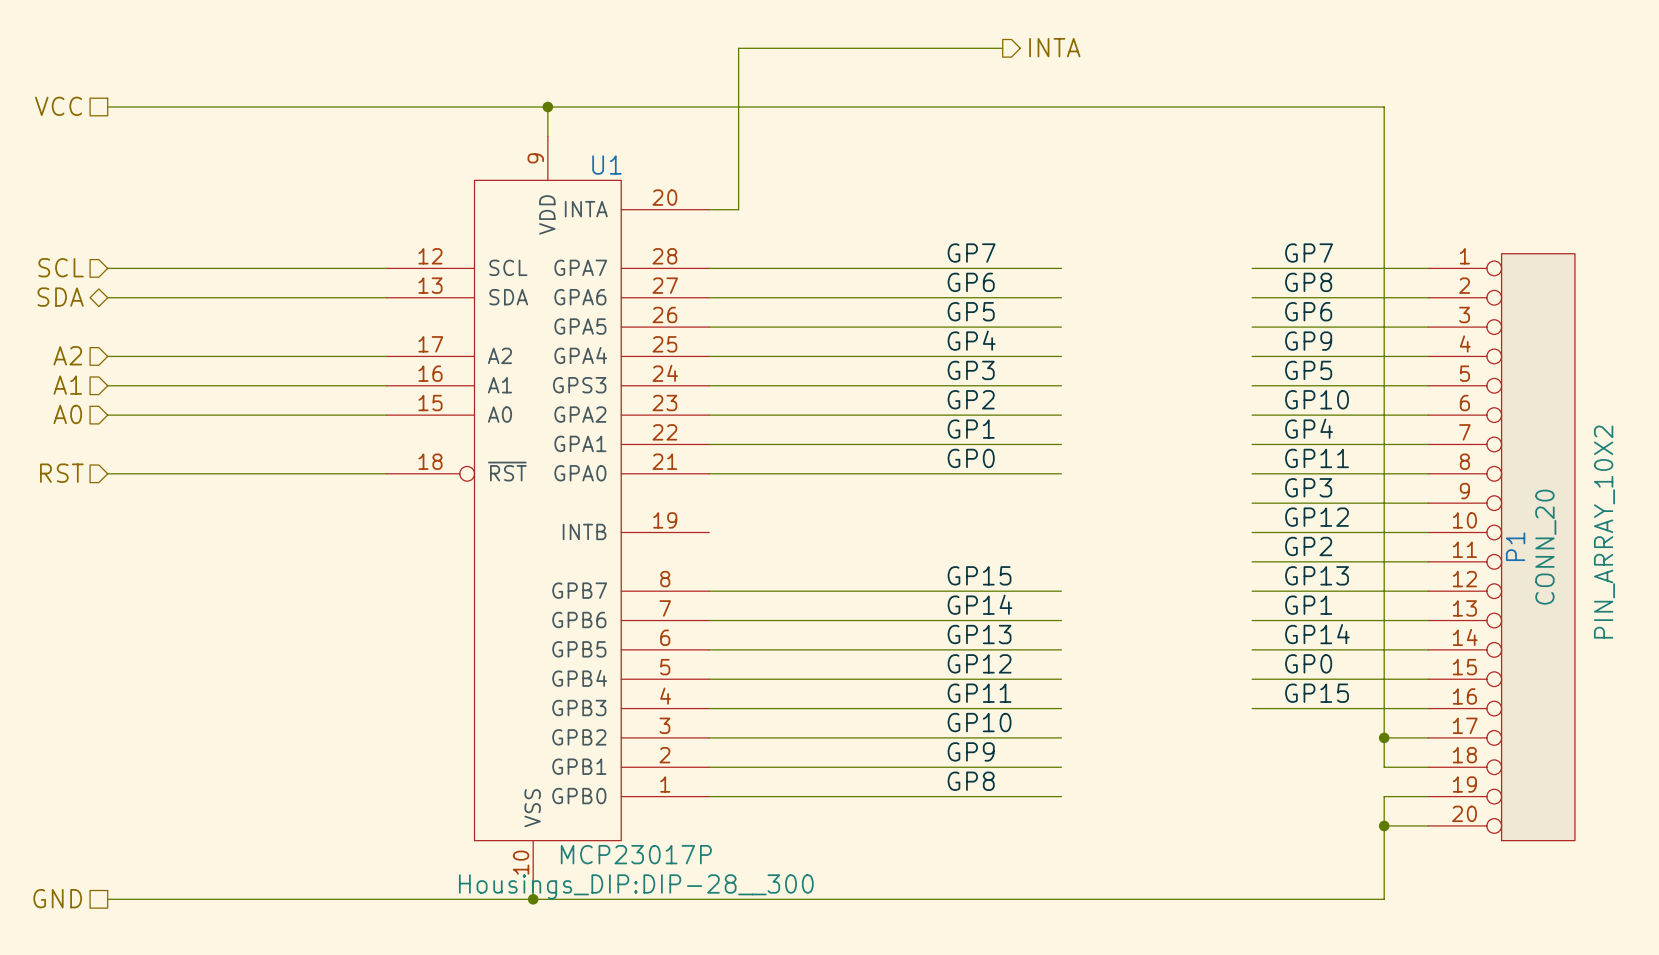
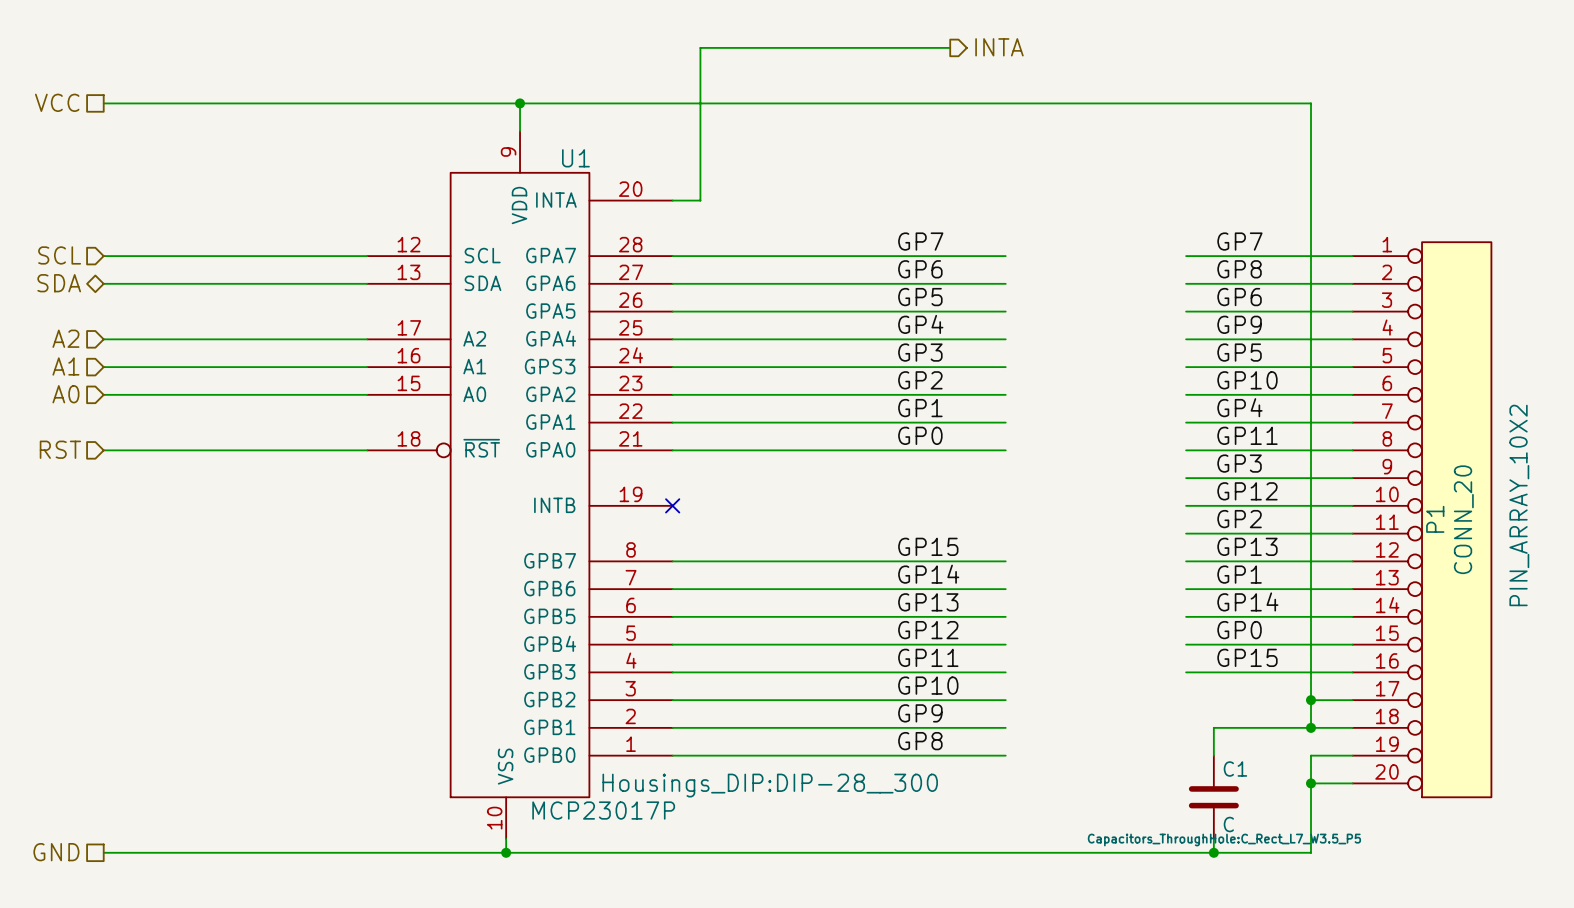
no-connect mark: none -> (672, 505)
wire: none -> (1311, 727) (1213, 727) (1213, 755)
junction: none -> (1311, 727)
C1: none -> C (1213, 797)
wire: none -> (1213, 838) (1213, 852)
U1 text position: Housings_DIP:DIP-28__300 (636, 886) -> Housings_DIP:DIP-28__300 (770, 785)
junction: none -> (1213, 852)

